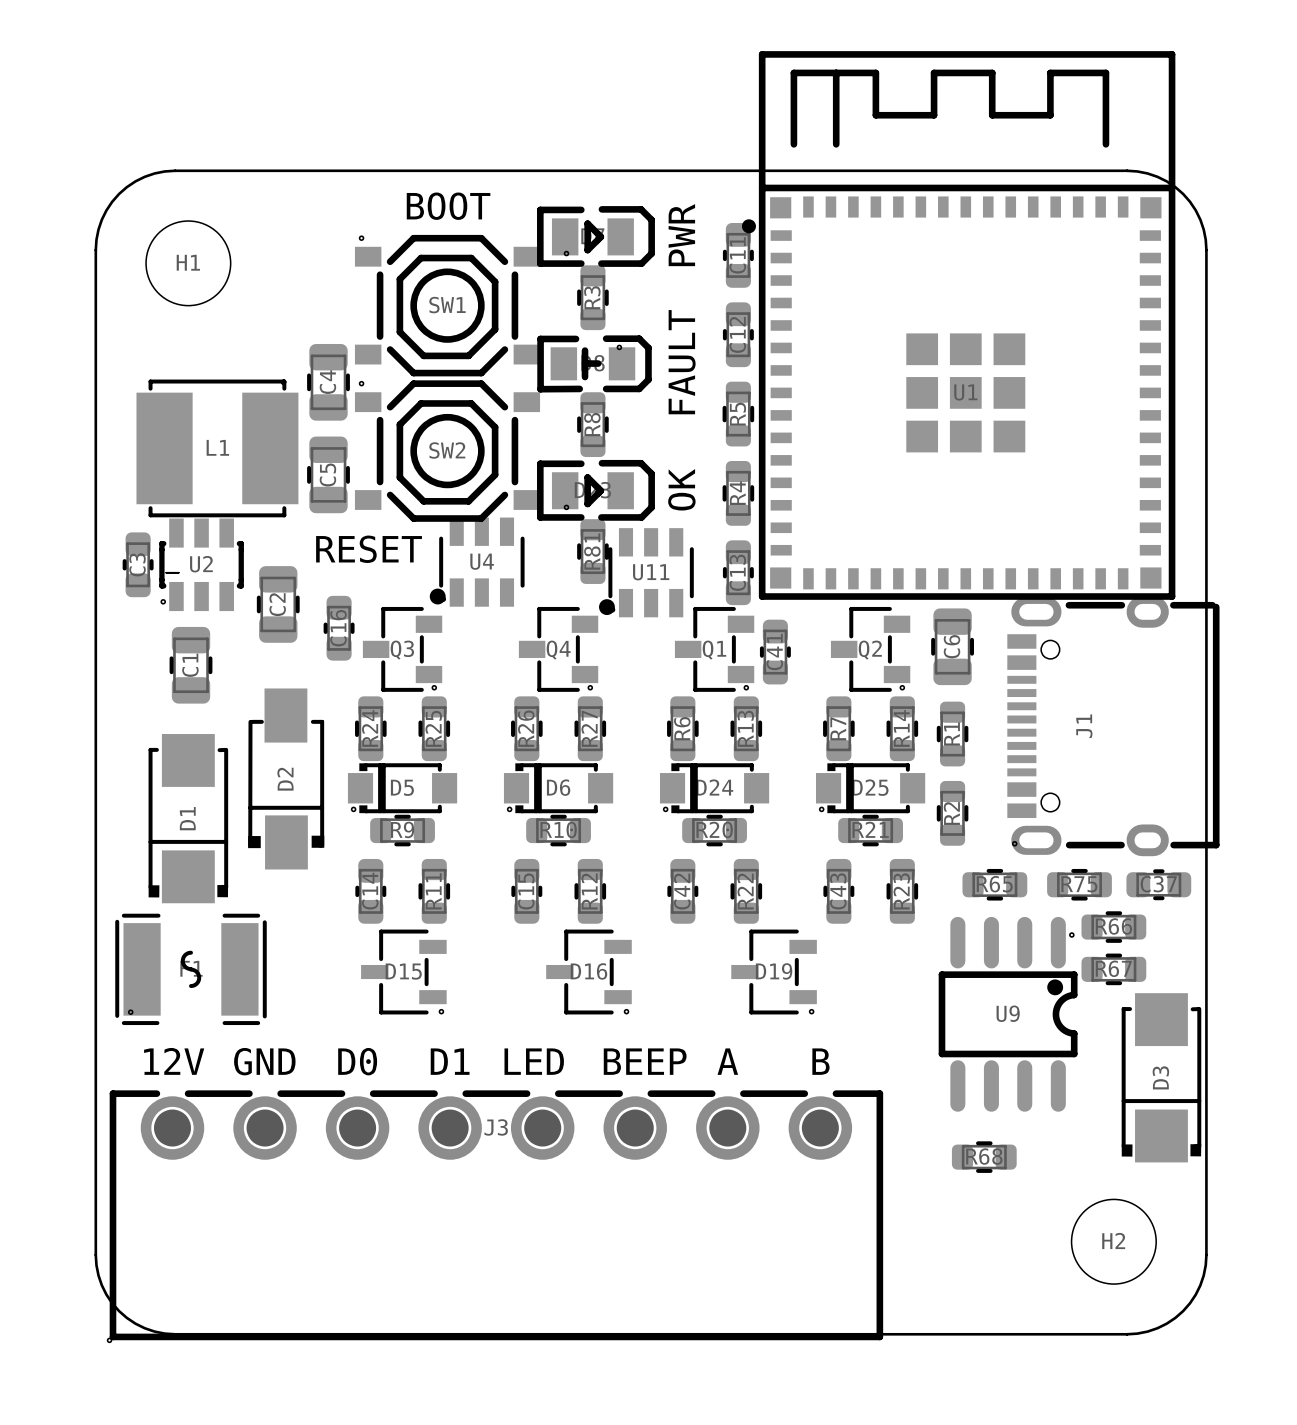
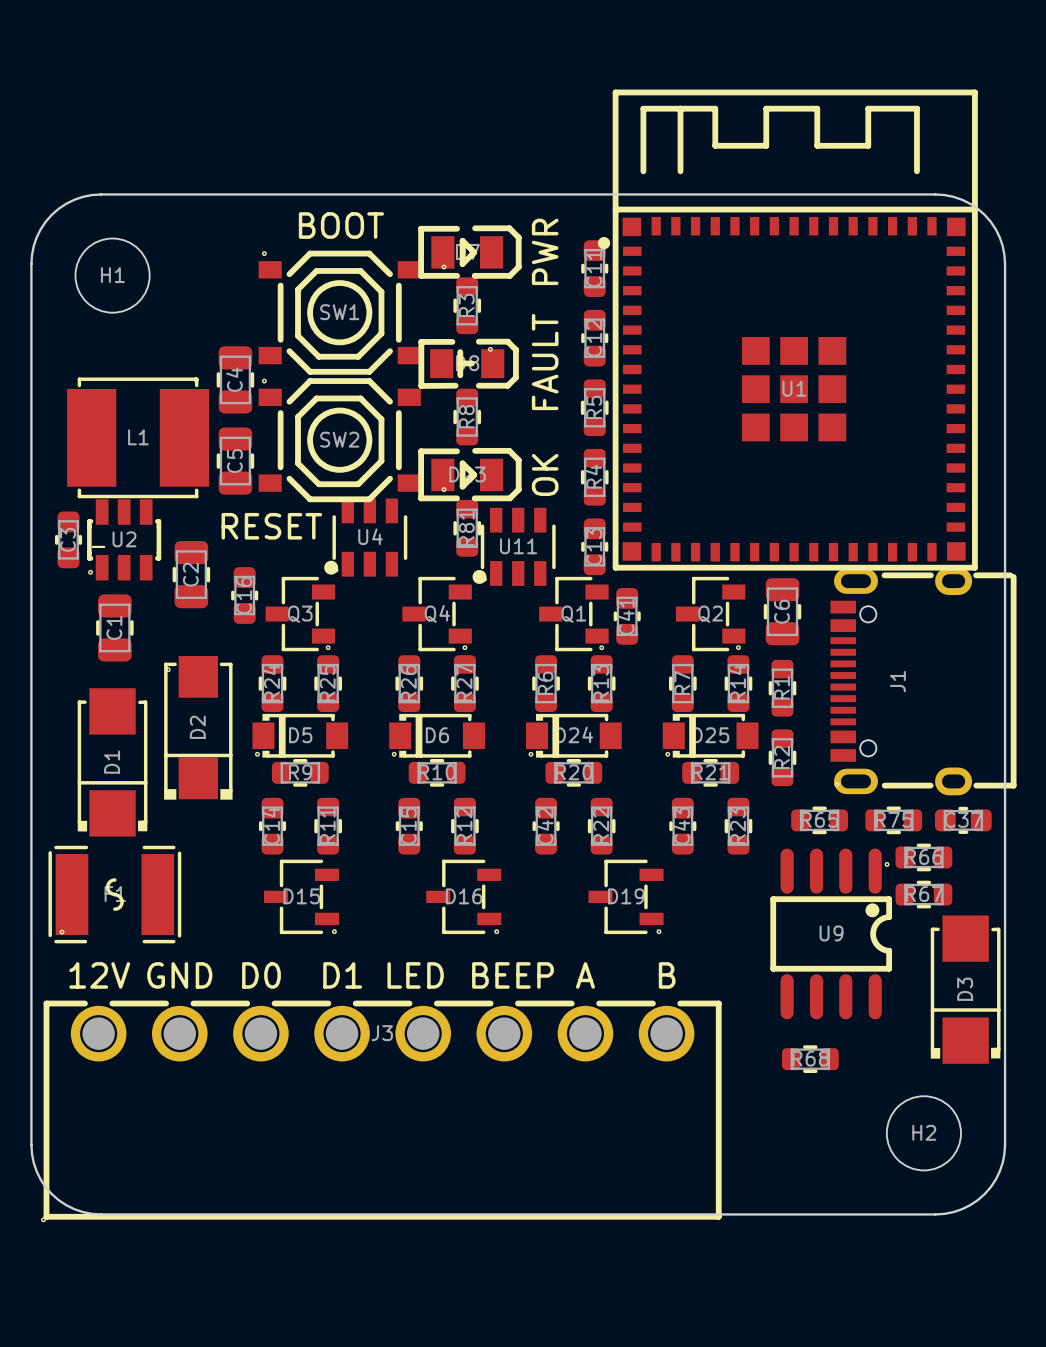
D2 footprint: [248, 688, 325, 870] -> [164, 656, 233, 800]

